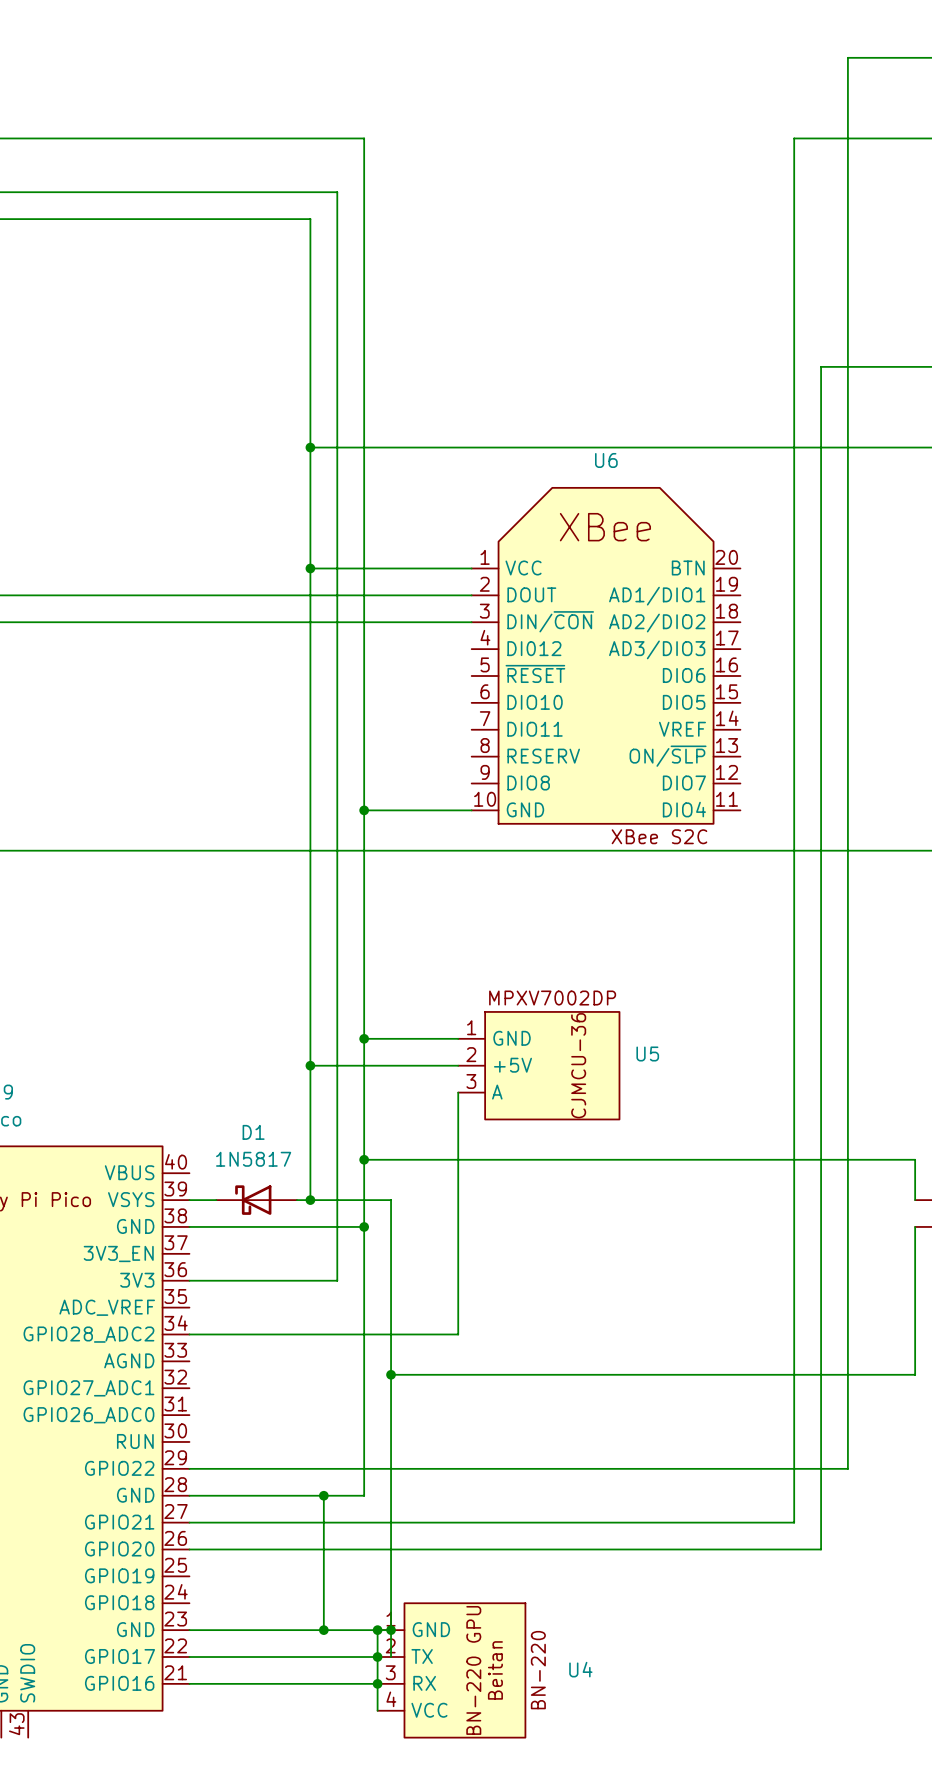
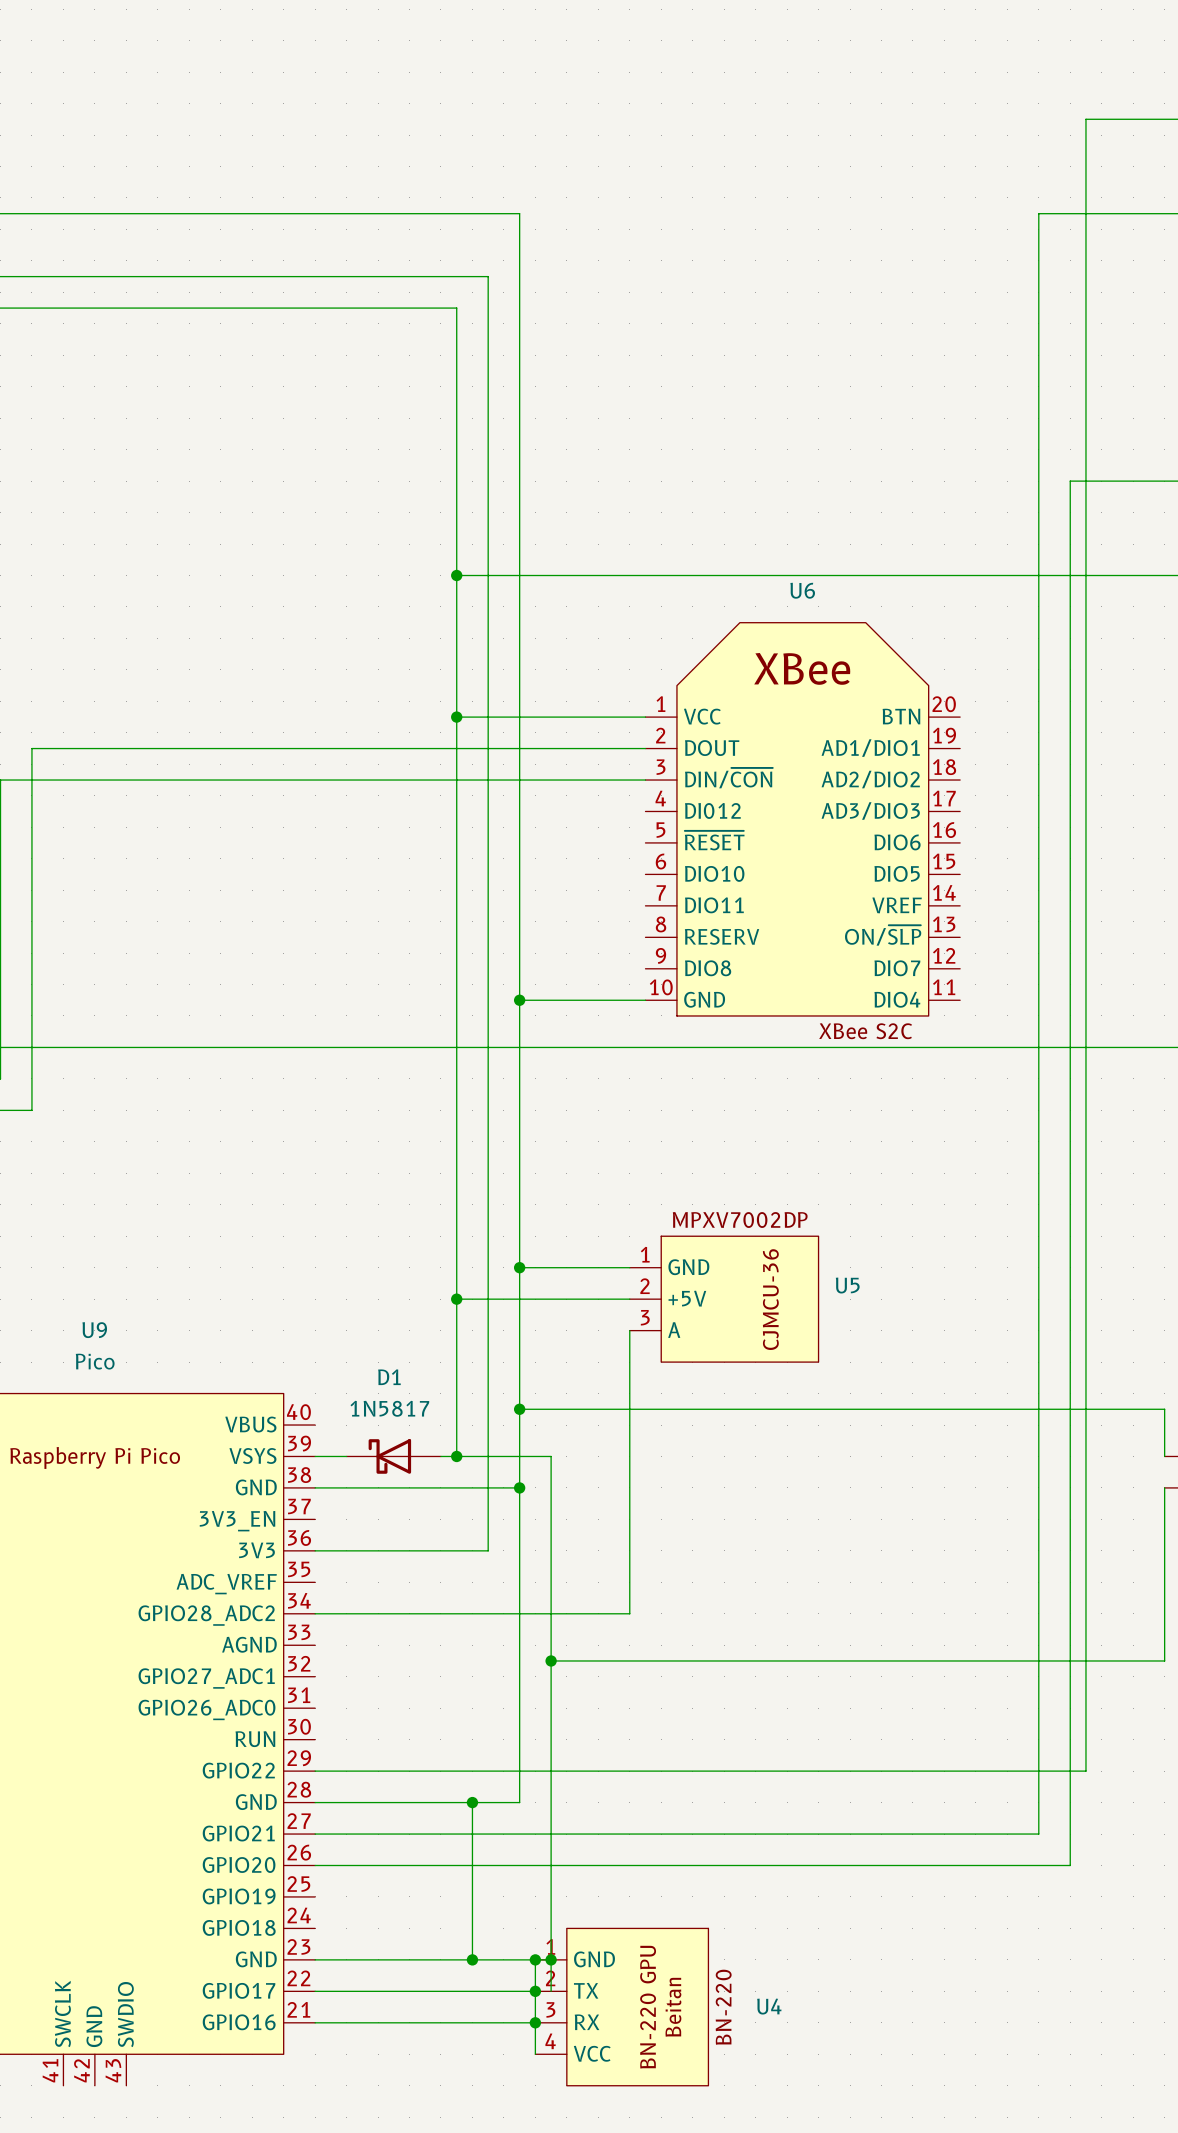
wire: (807, 138) (794, 138) (794, 1522) -> (1038, 213) (1038, 1834) (1023, 1834)
wire: (834, 366) (821, 366) (821, 1549) -> (1070, 481) (1070, 1865) (1054, 1865)

